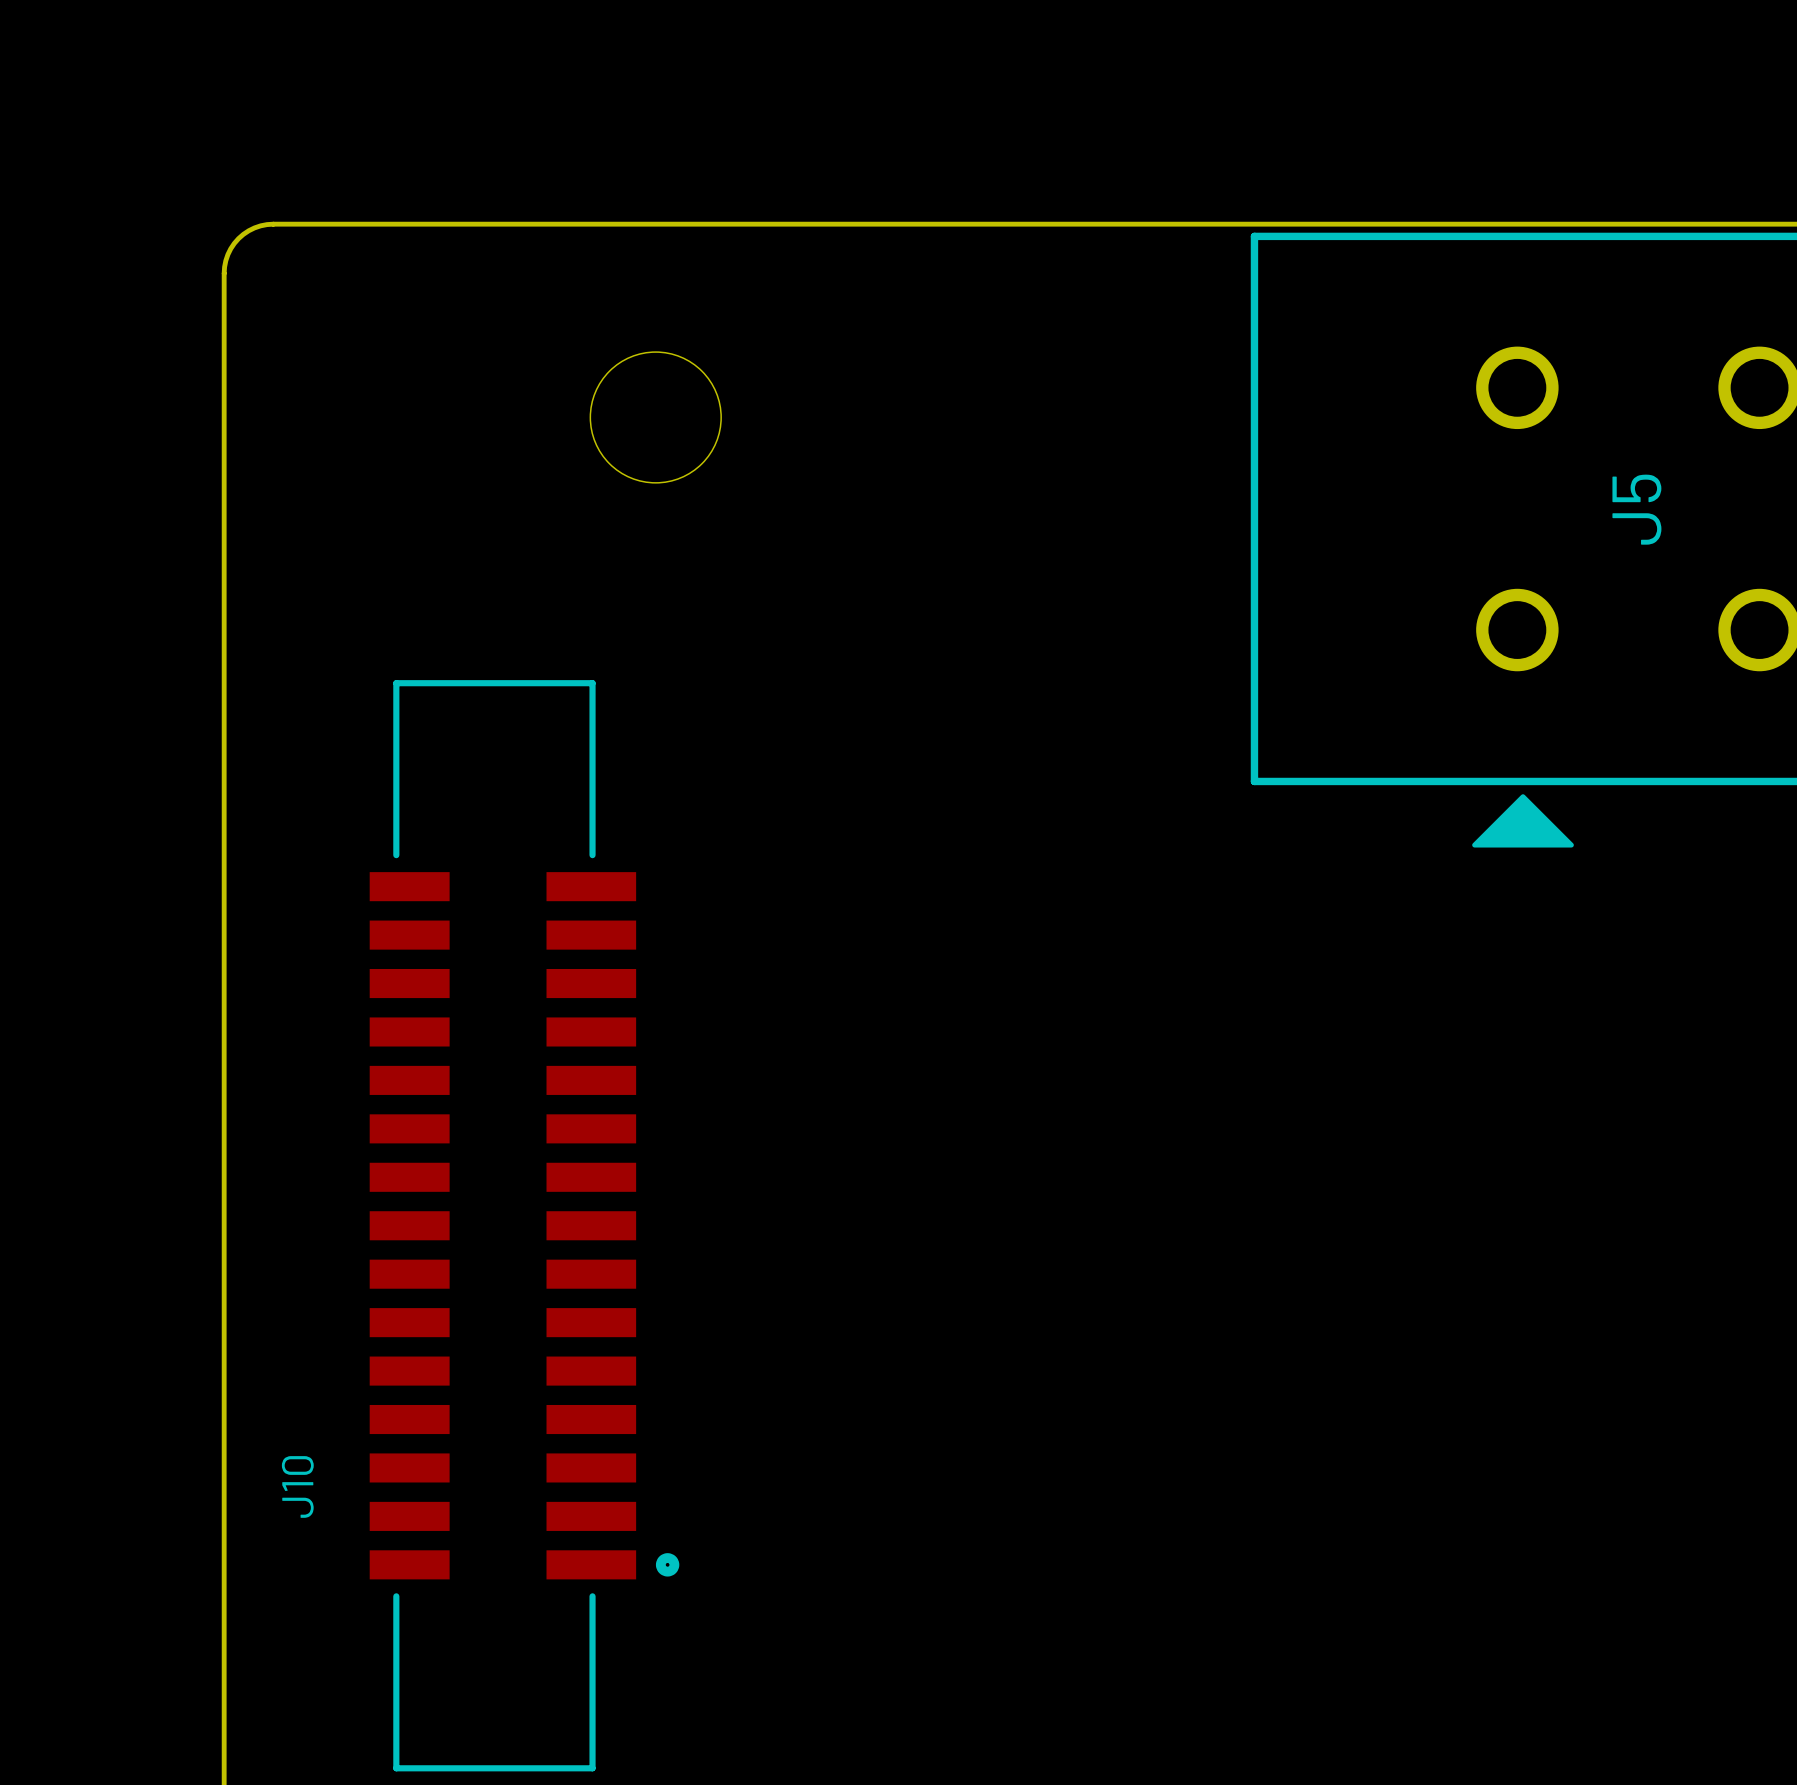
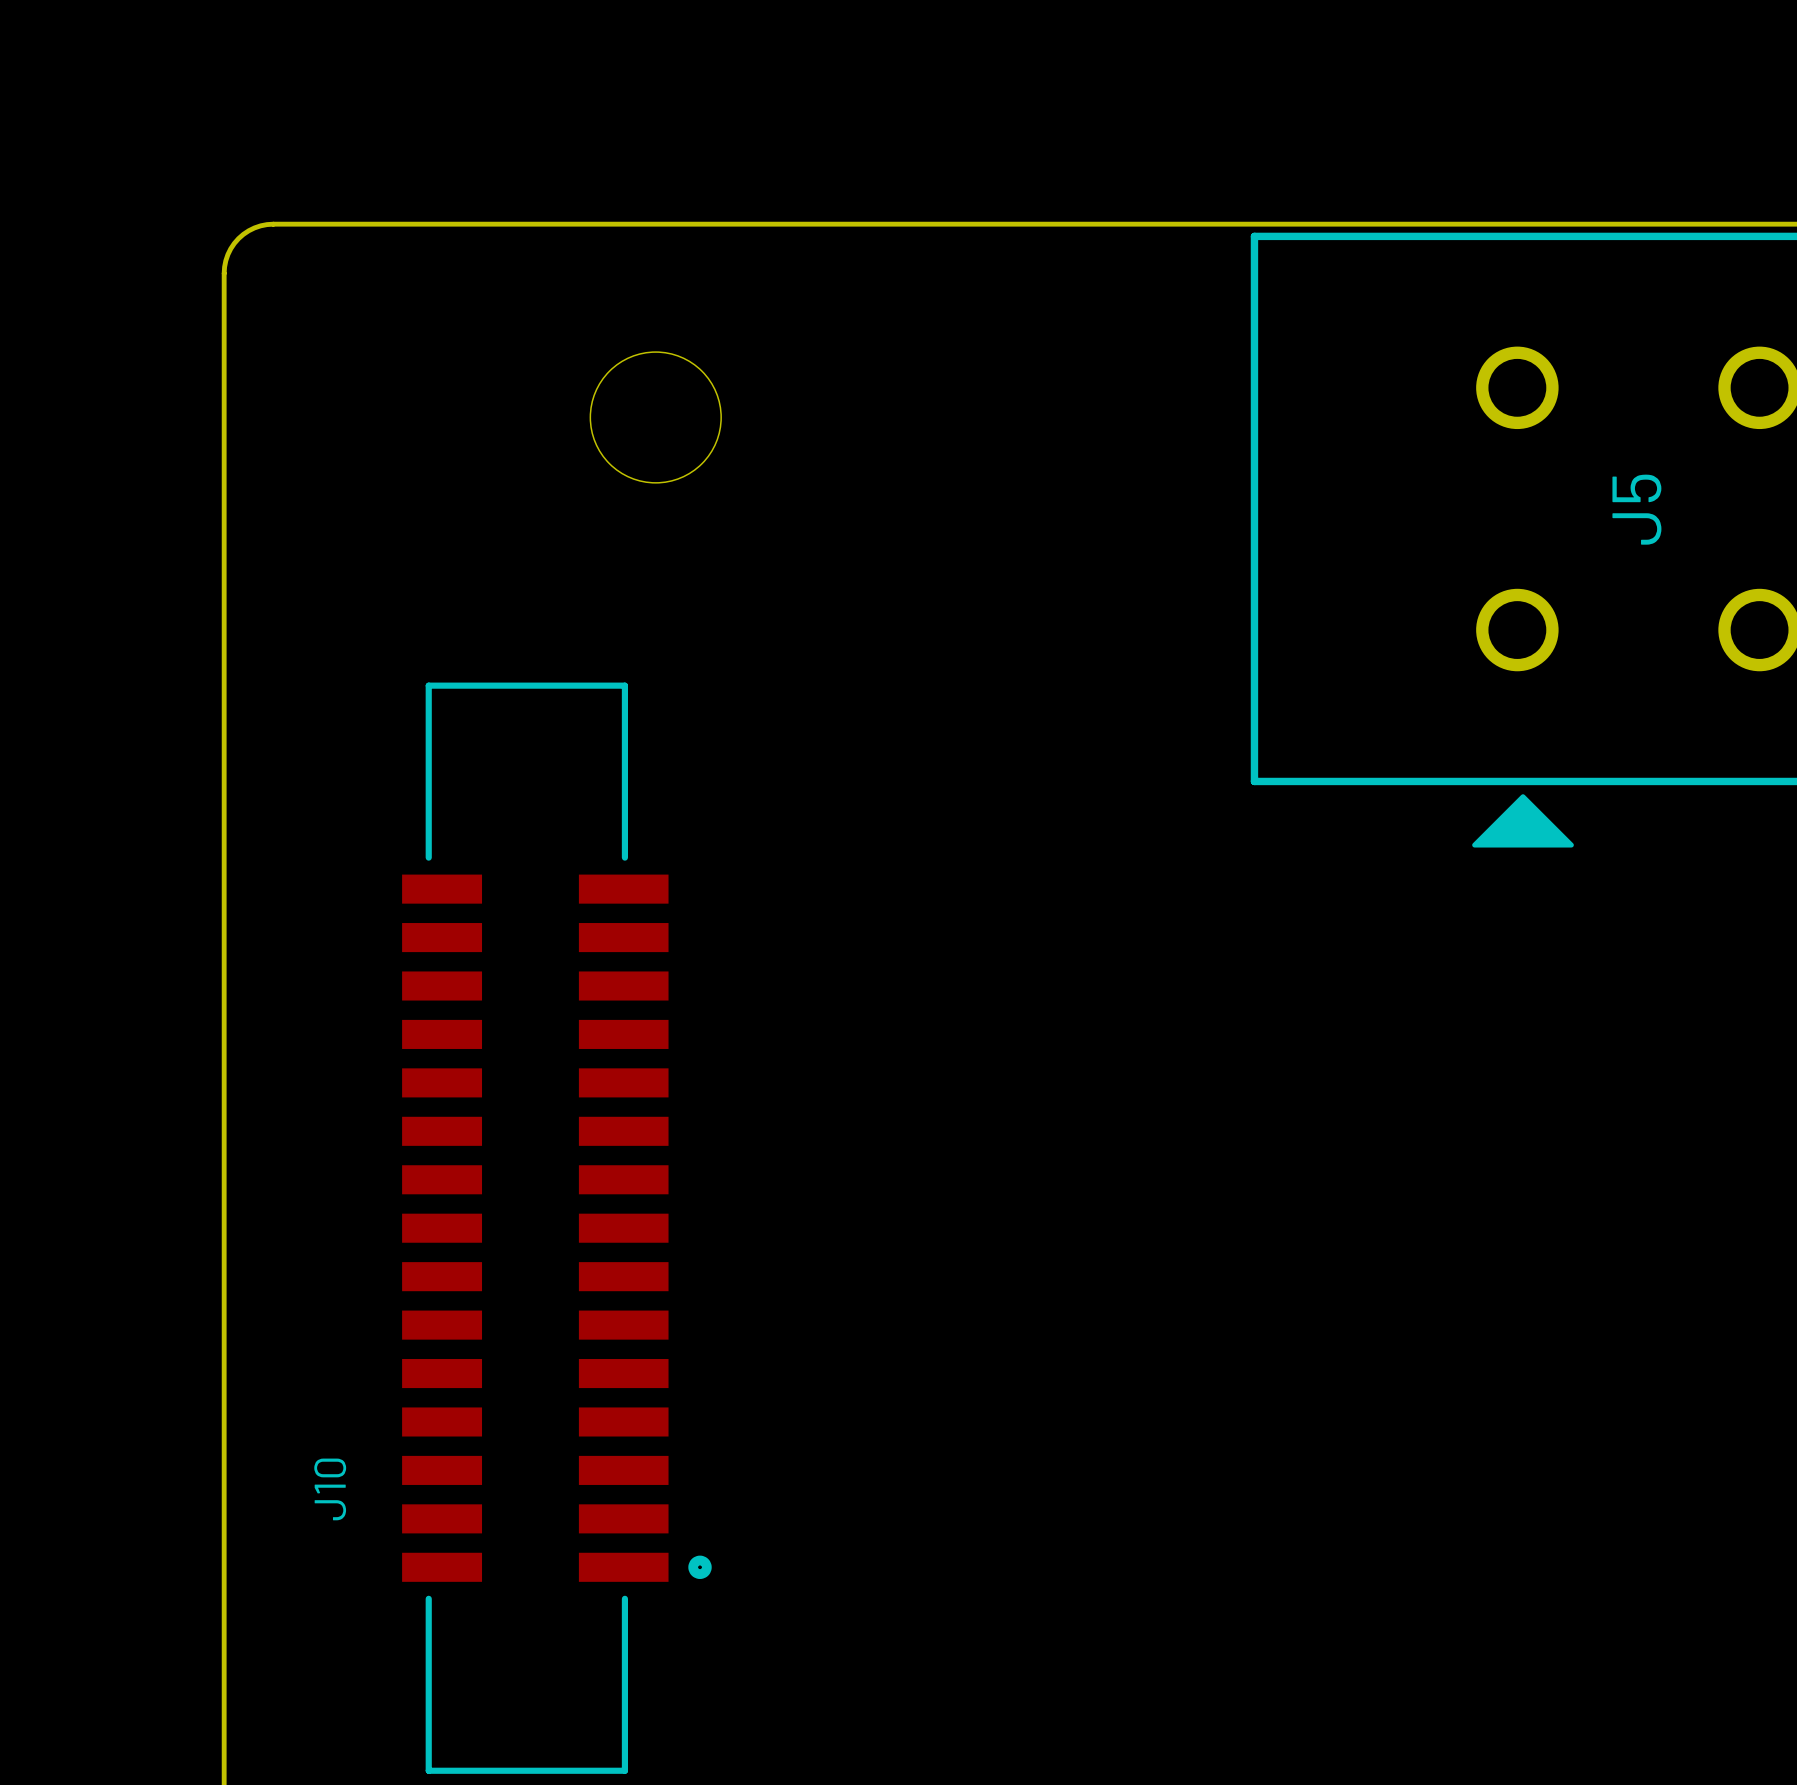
J10 position: (524, 1225) -> (556, 1228)

